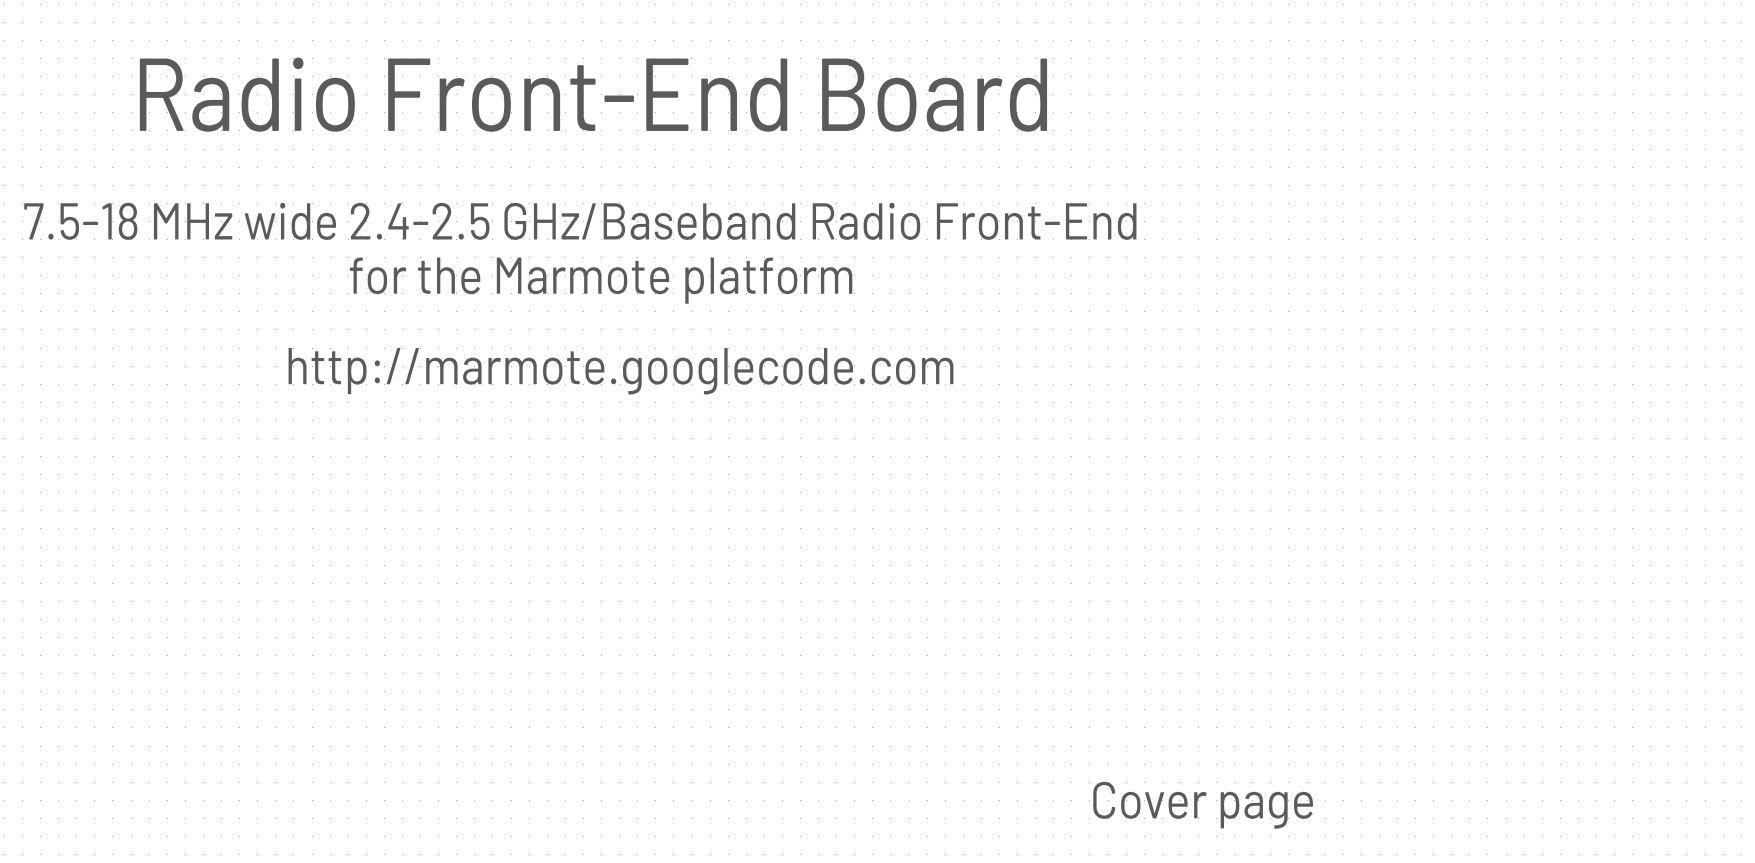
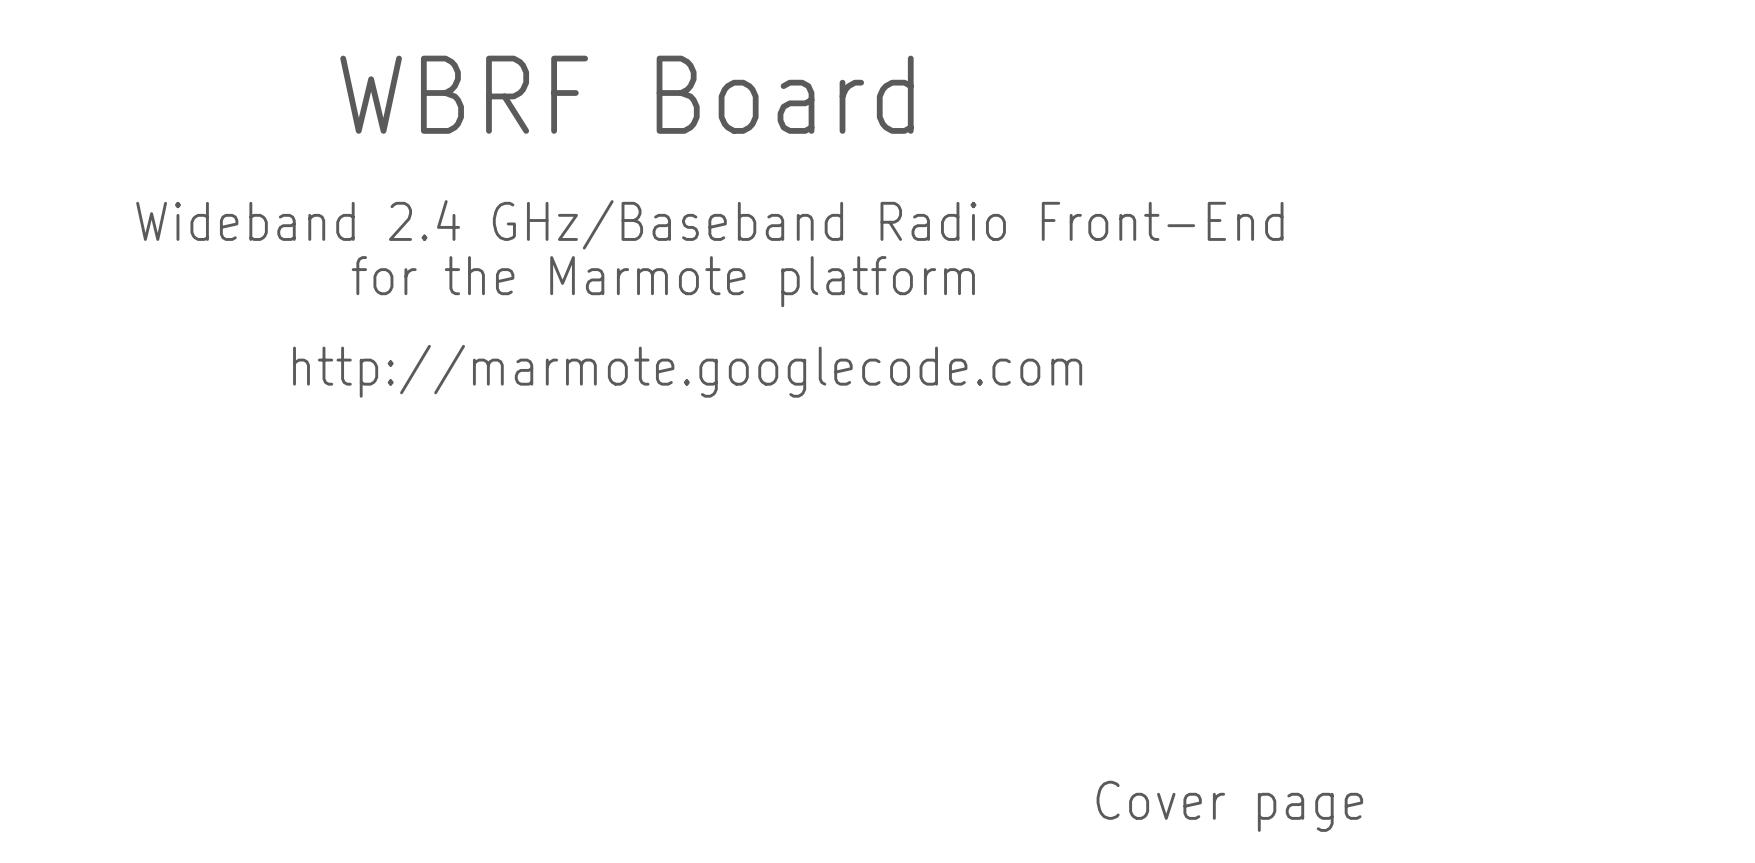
text: Radio Front-End Board (593, 94) -> none
text: none -> WBRF Board (626, 94)
text: 7.5-18 MHz wide 2.4-2.5 GHz/Baseband Radio Front-End (580, 221) -> Wideband 2.4 GHz/Baseband Radio Front-End (709, 224)

